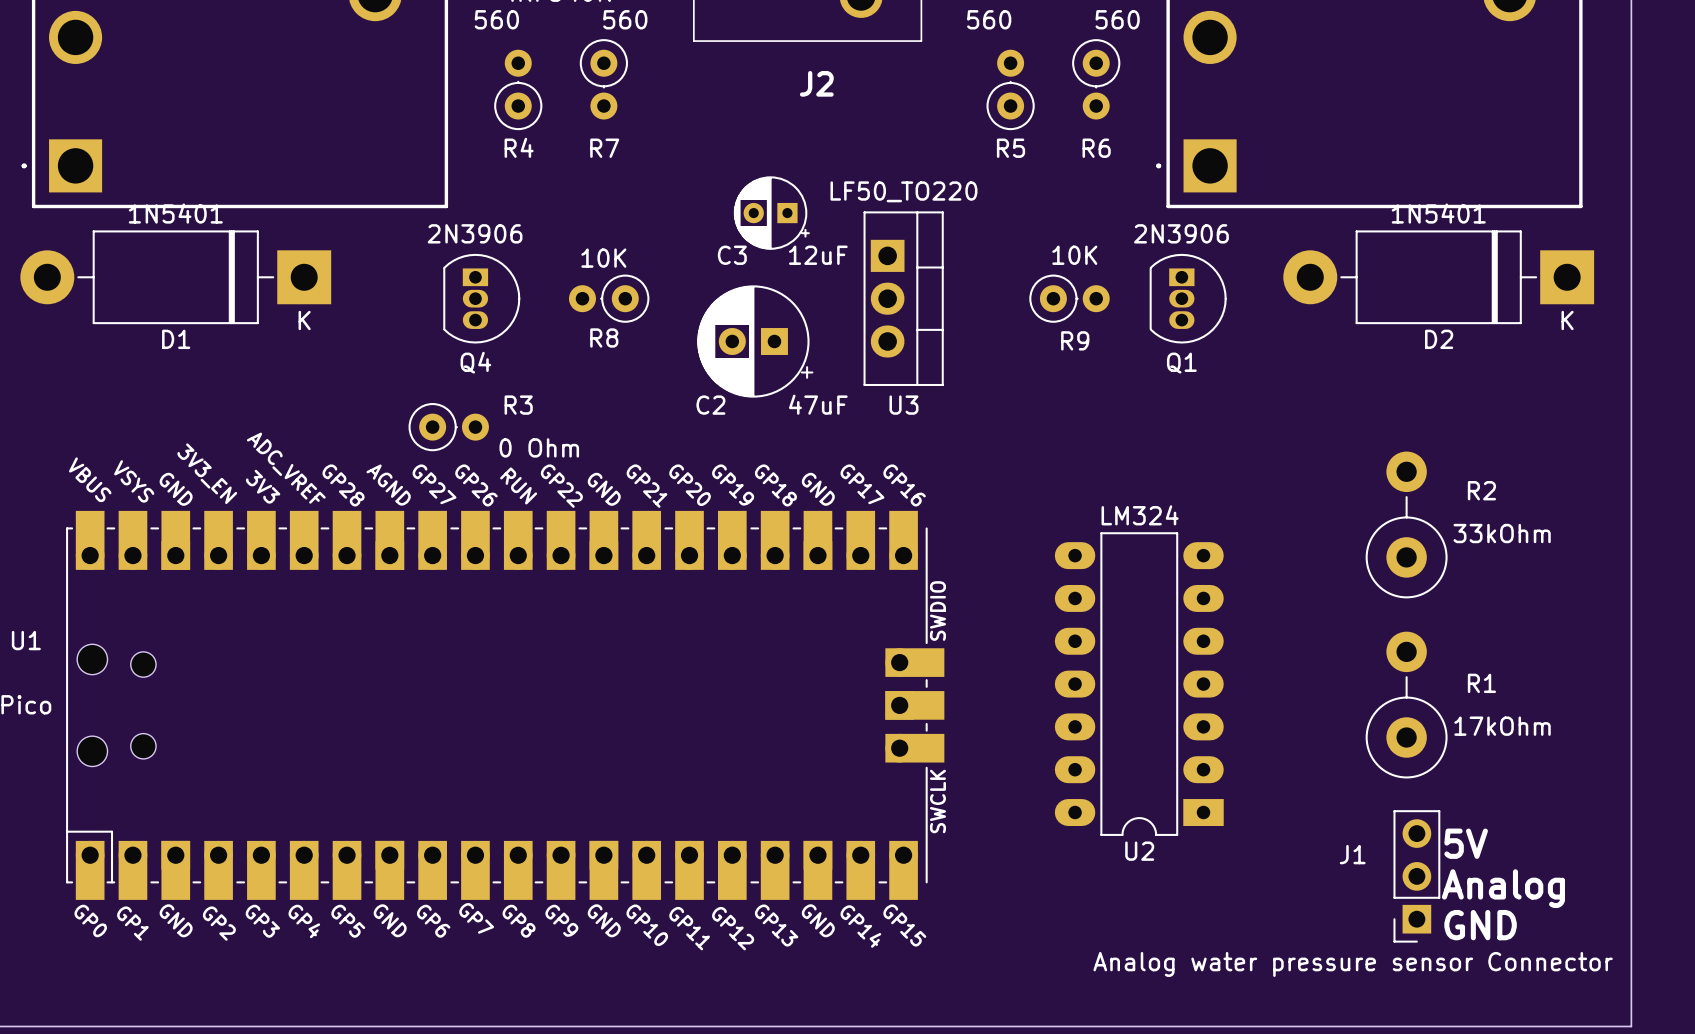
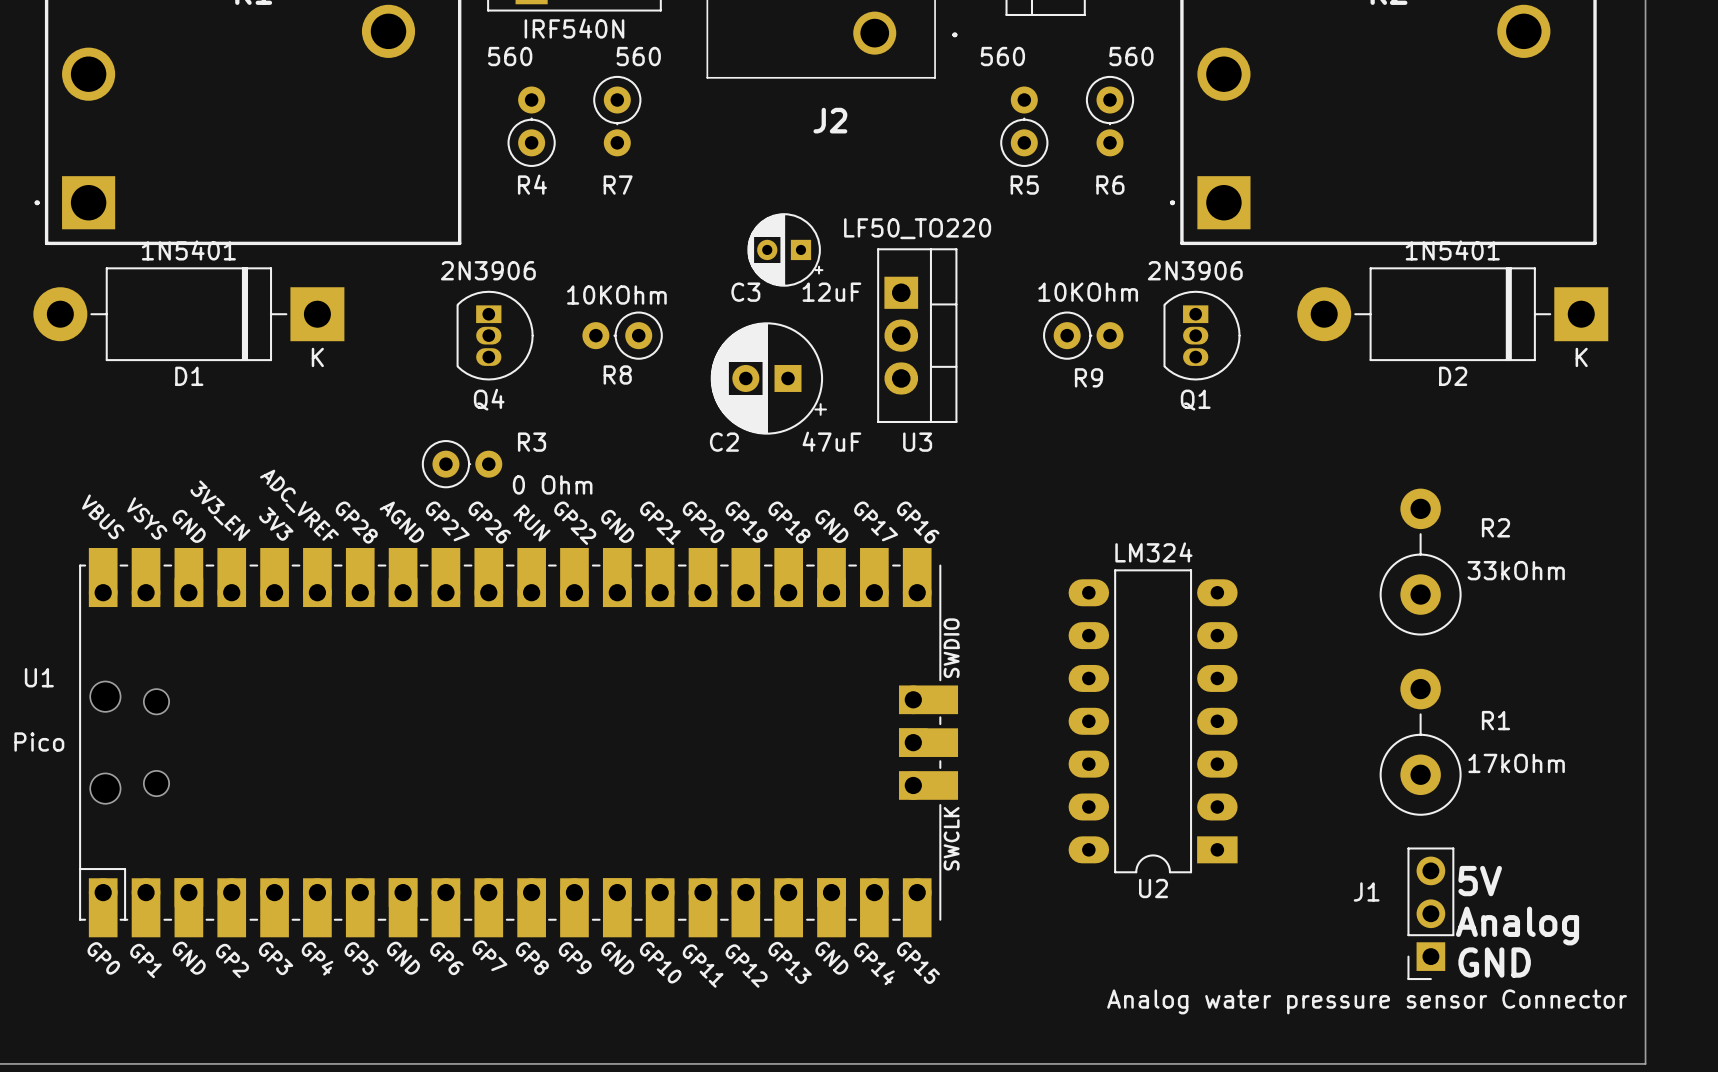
R9 value: 10K (1074, 255) -> 10KOhm (1088, 292)
R8 value: 10K (603, 258) -> 10KOhm (616, 295)

